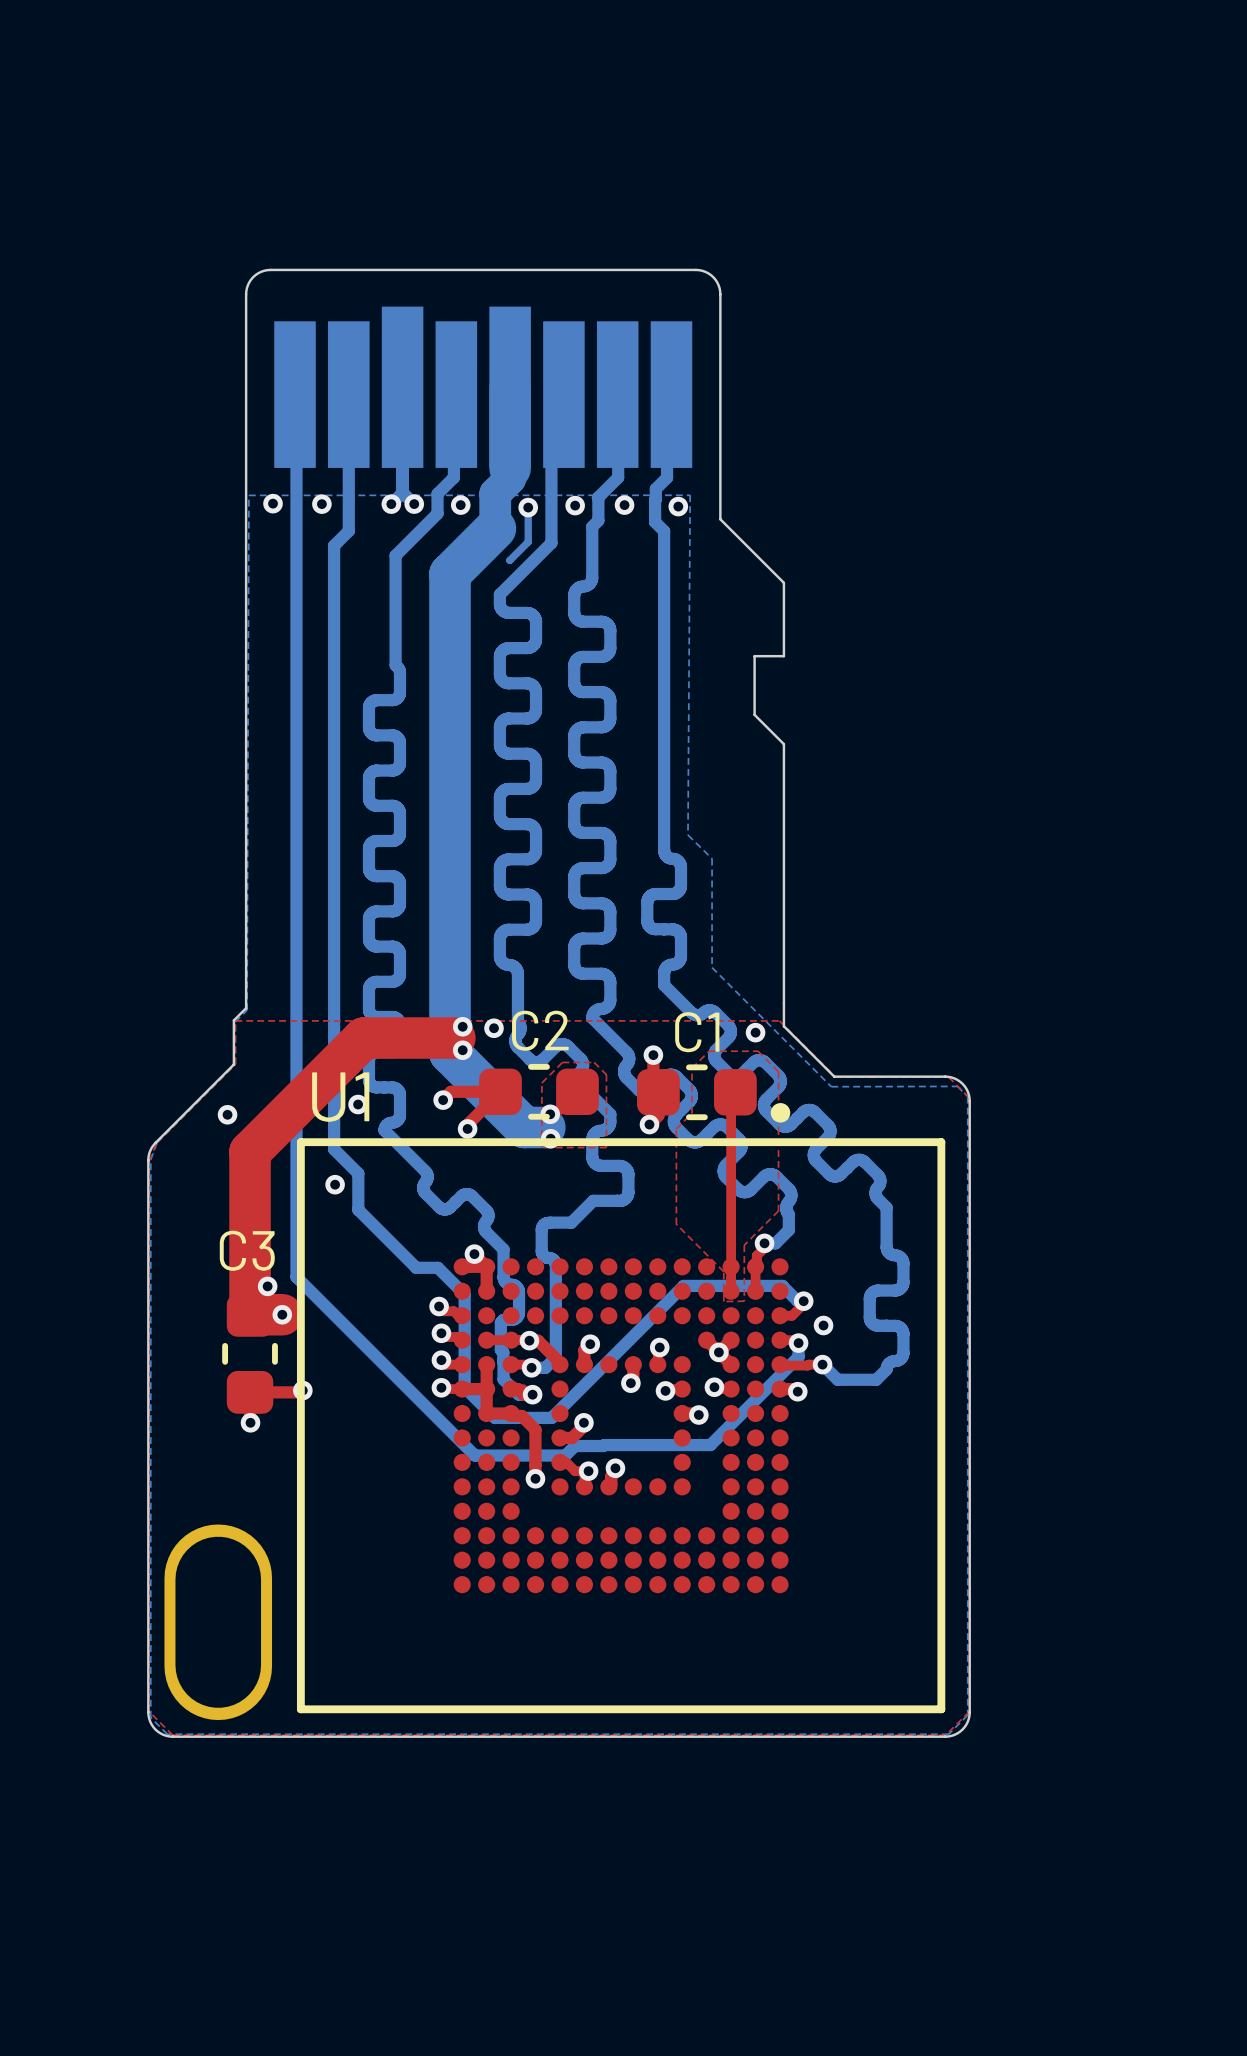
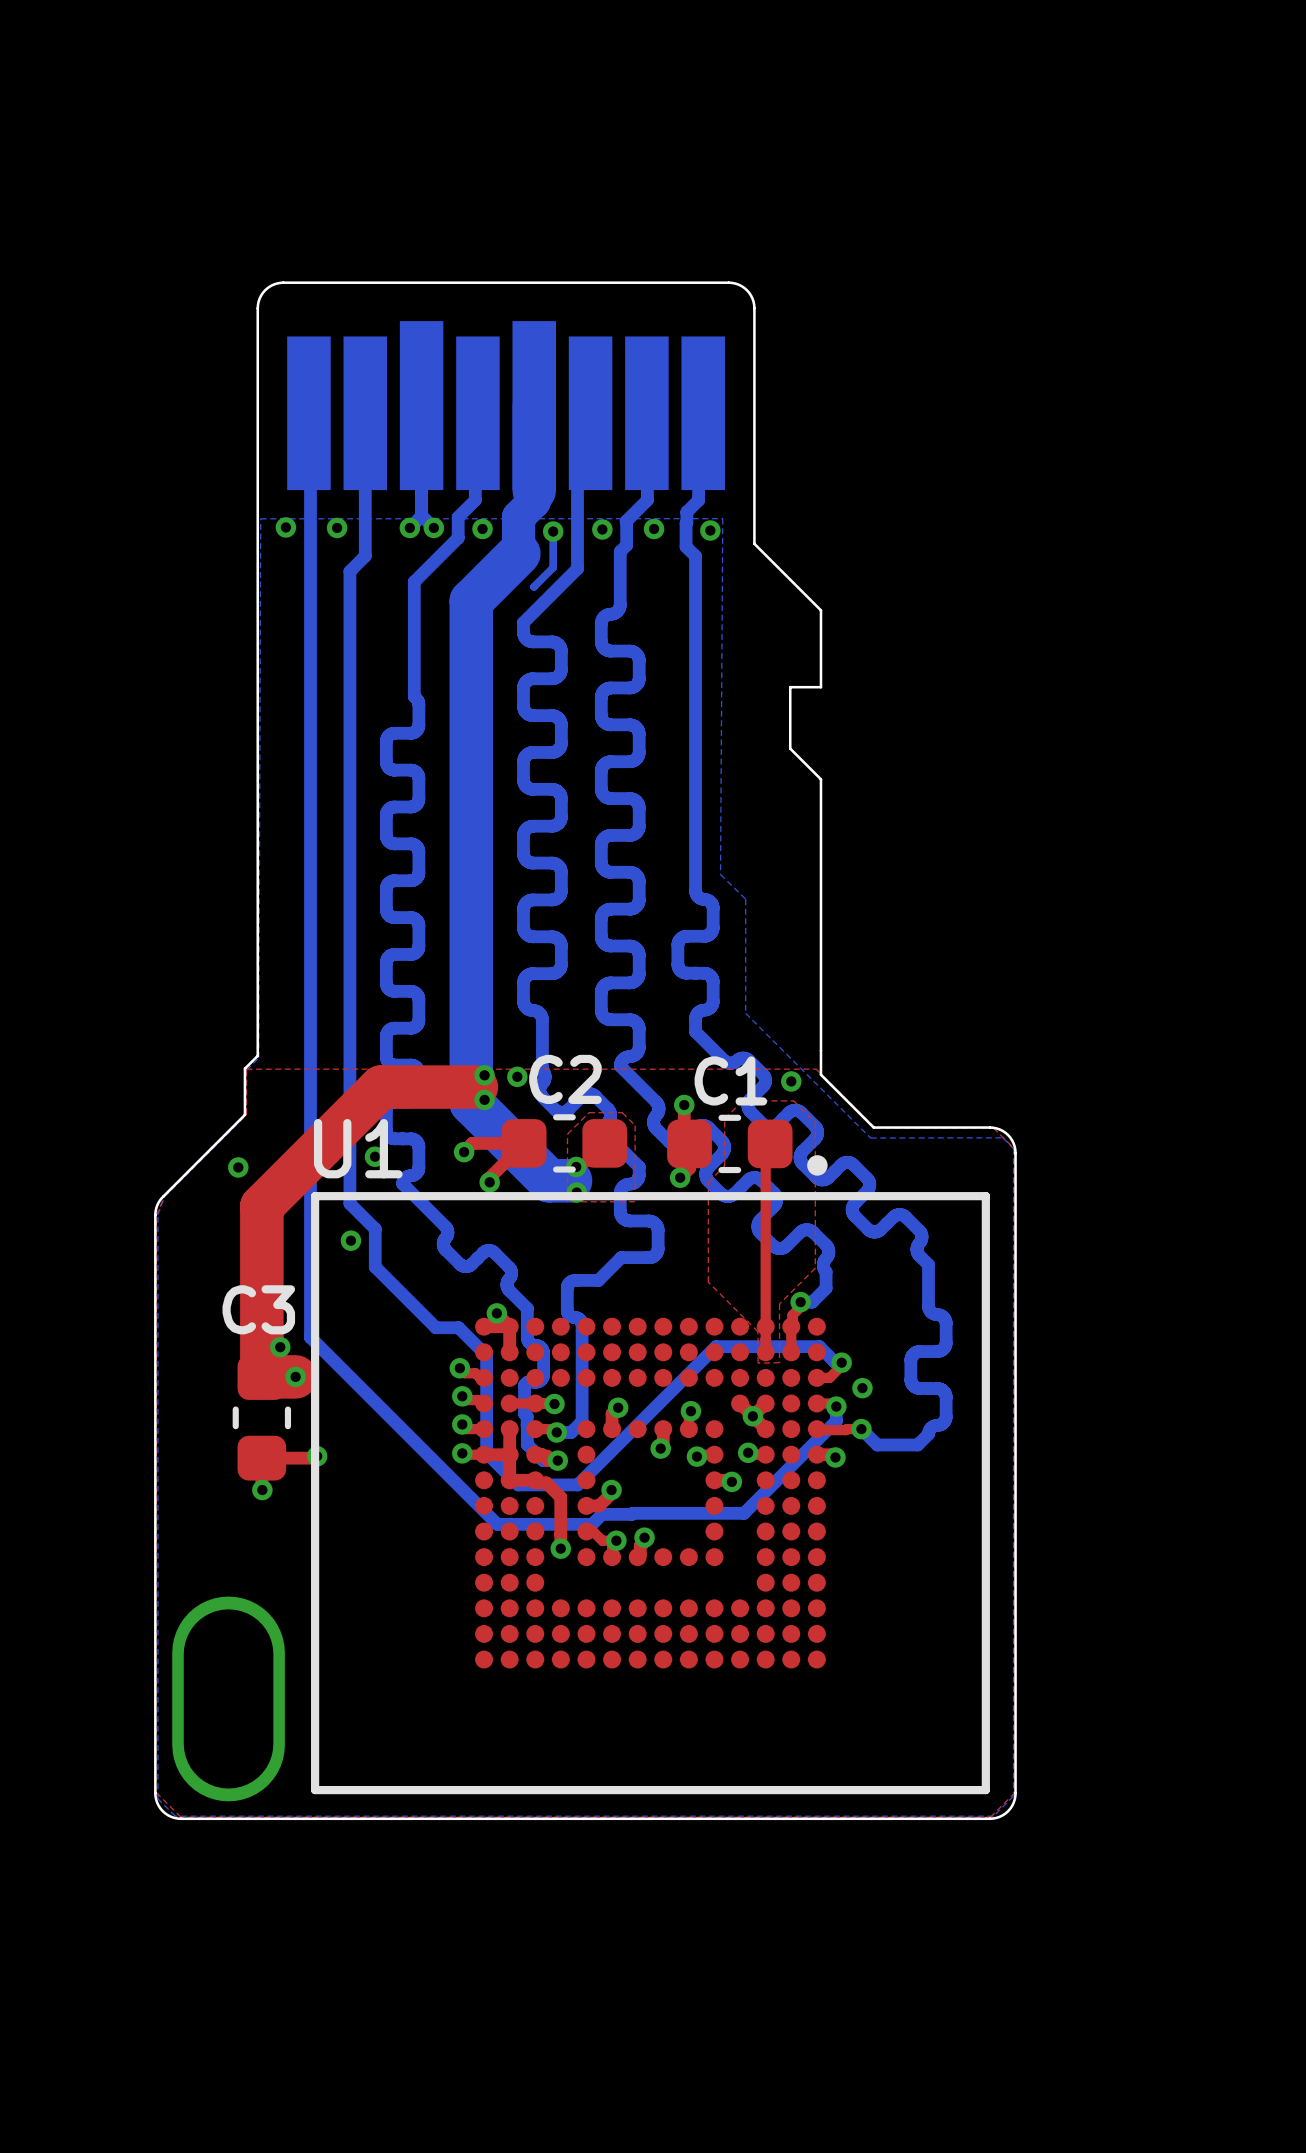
top track: (529, 1340) (538, 1340) (560, 1364) -> none

